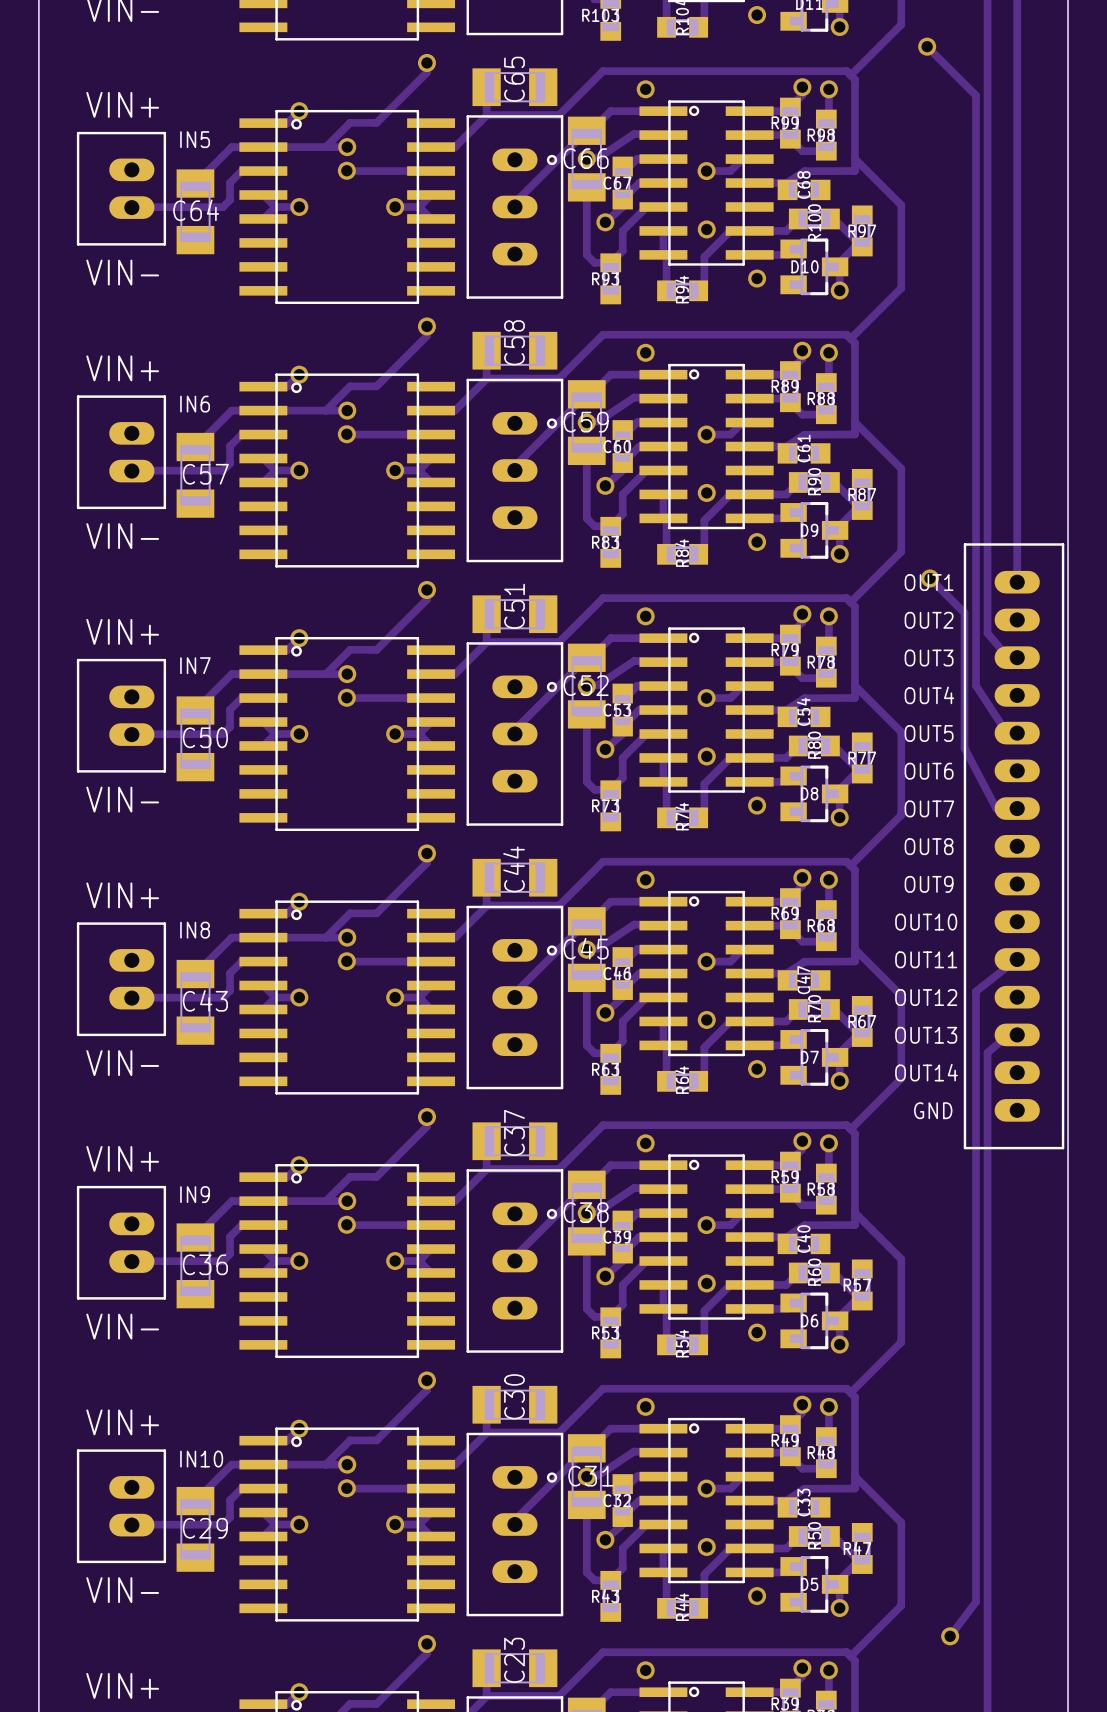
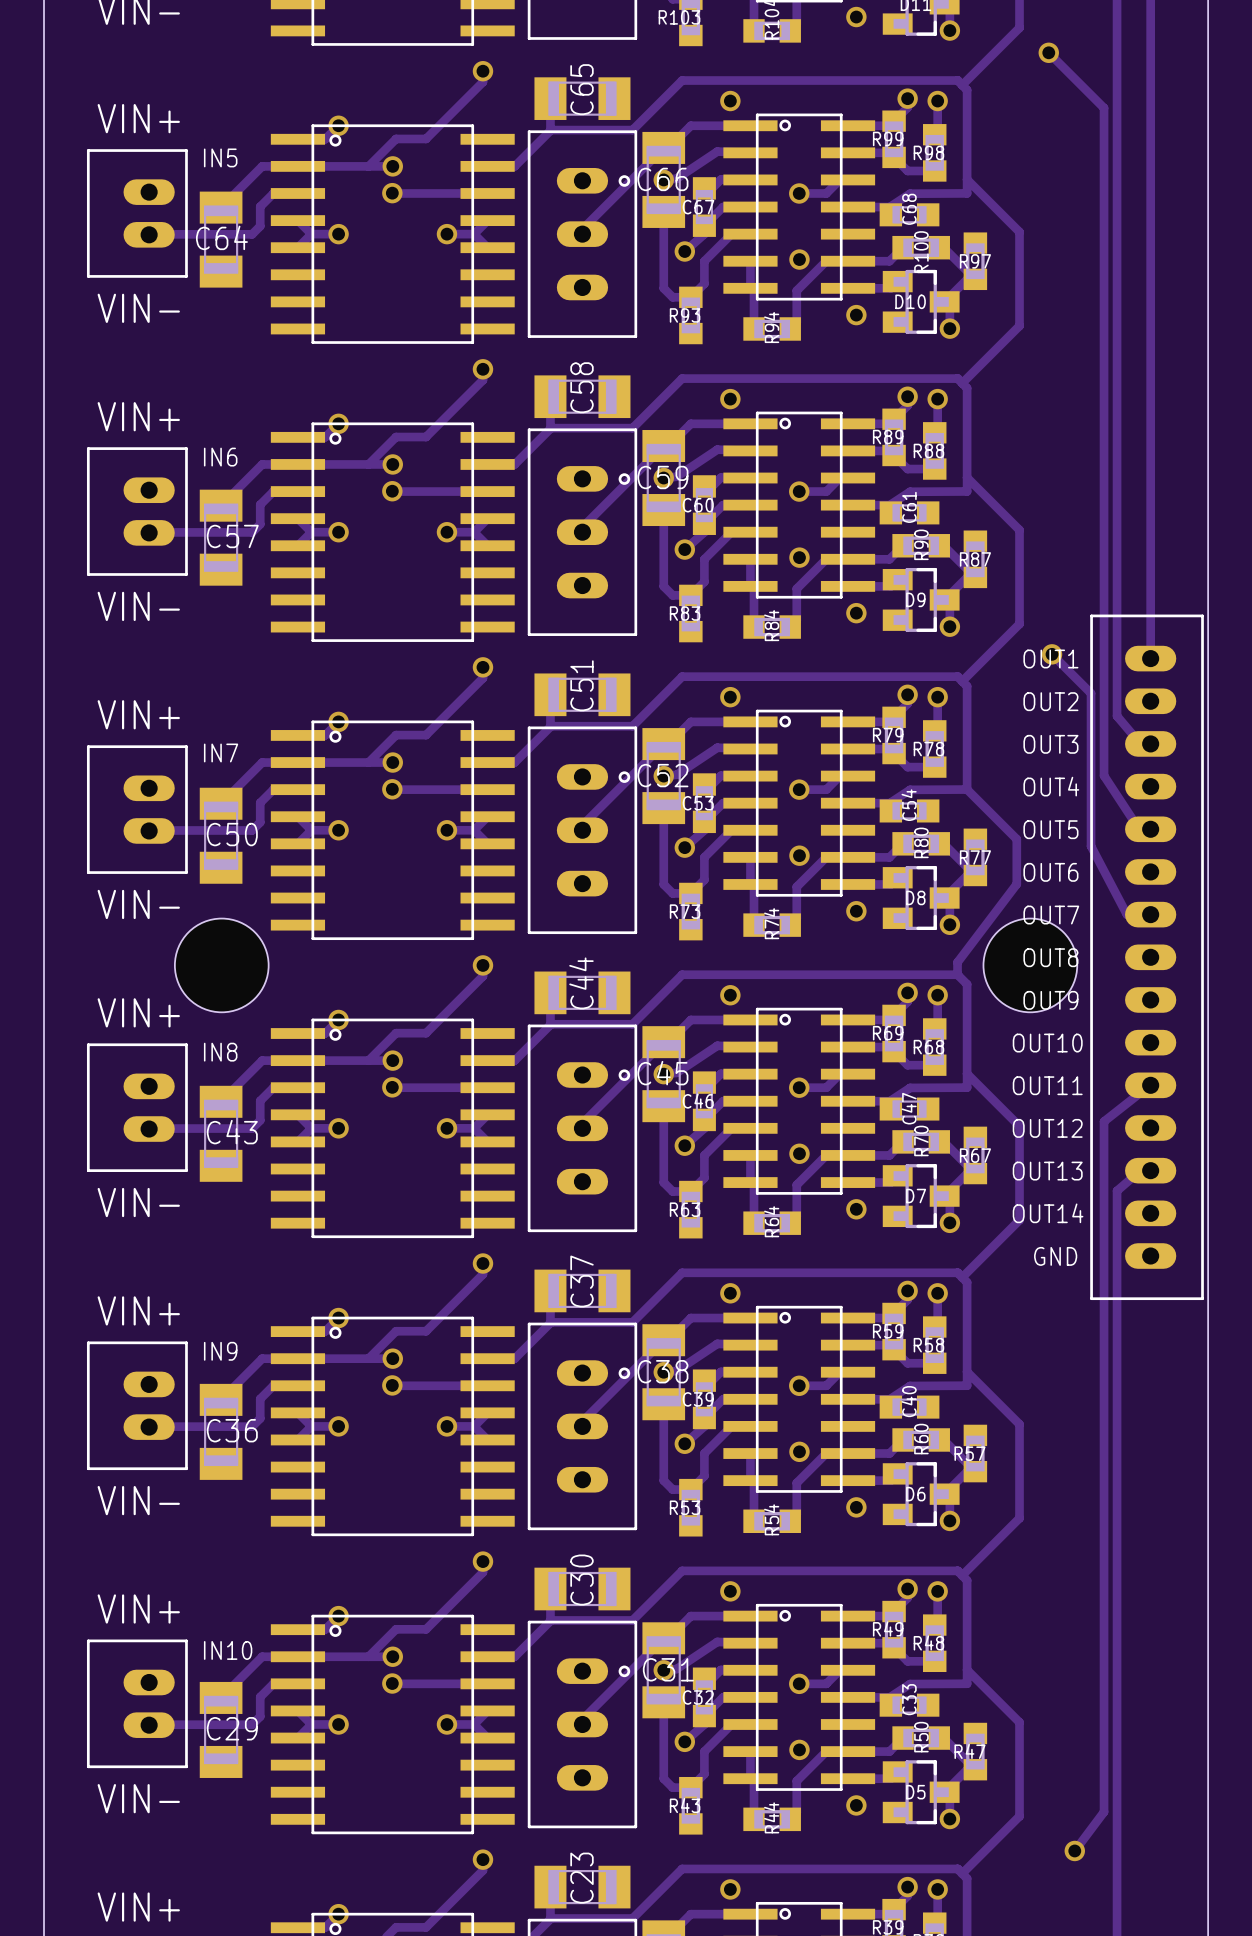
track: (854, 685) (901, 732) (901, 815) (850, 865) -> none
track: none -> (967, 789) (1016, 839) (1016, 884) (957, 962) (957, 974)
hole: none -> (221, 965)
hole: none -> (1030, 965)

